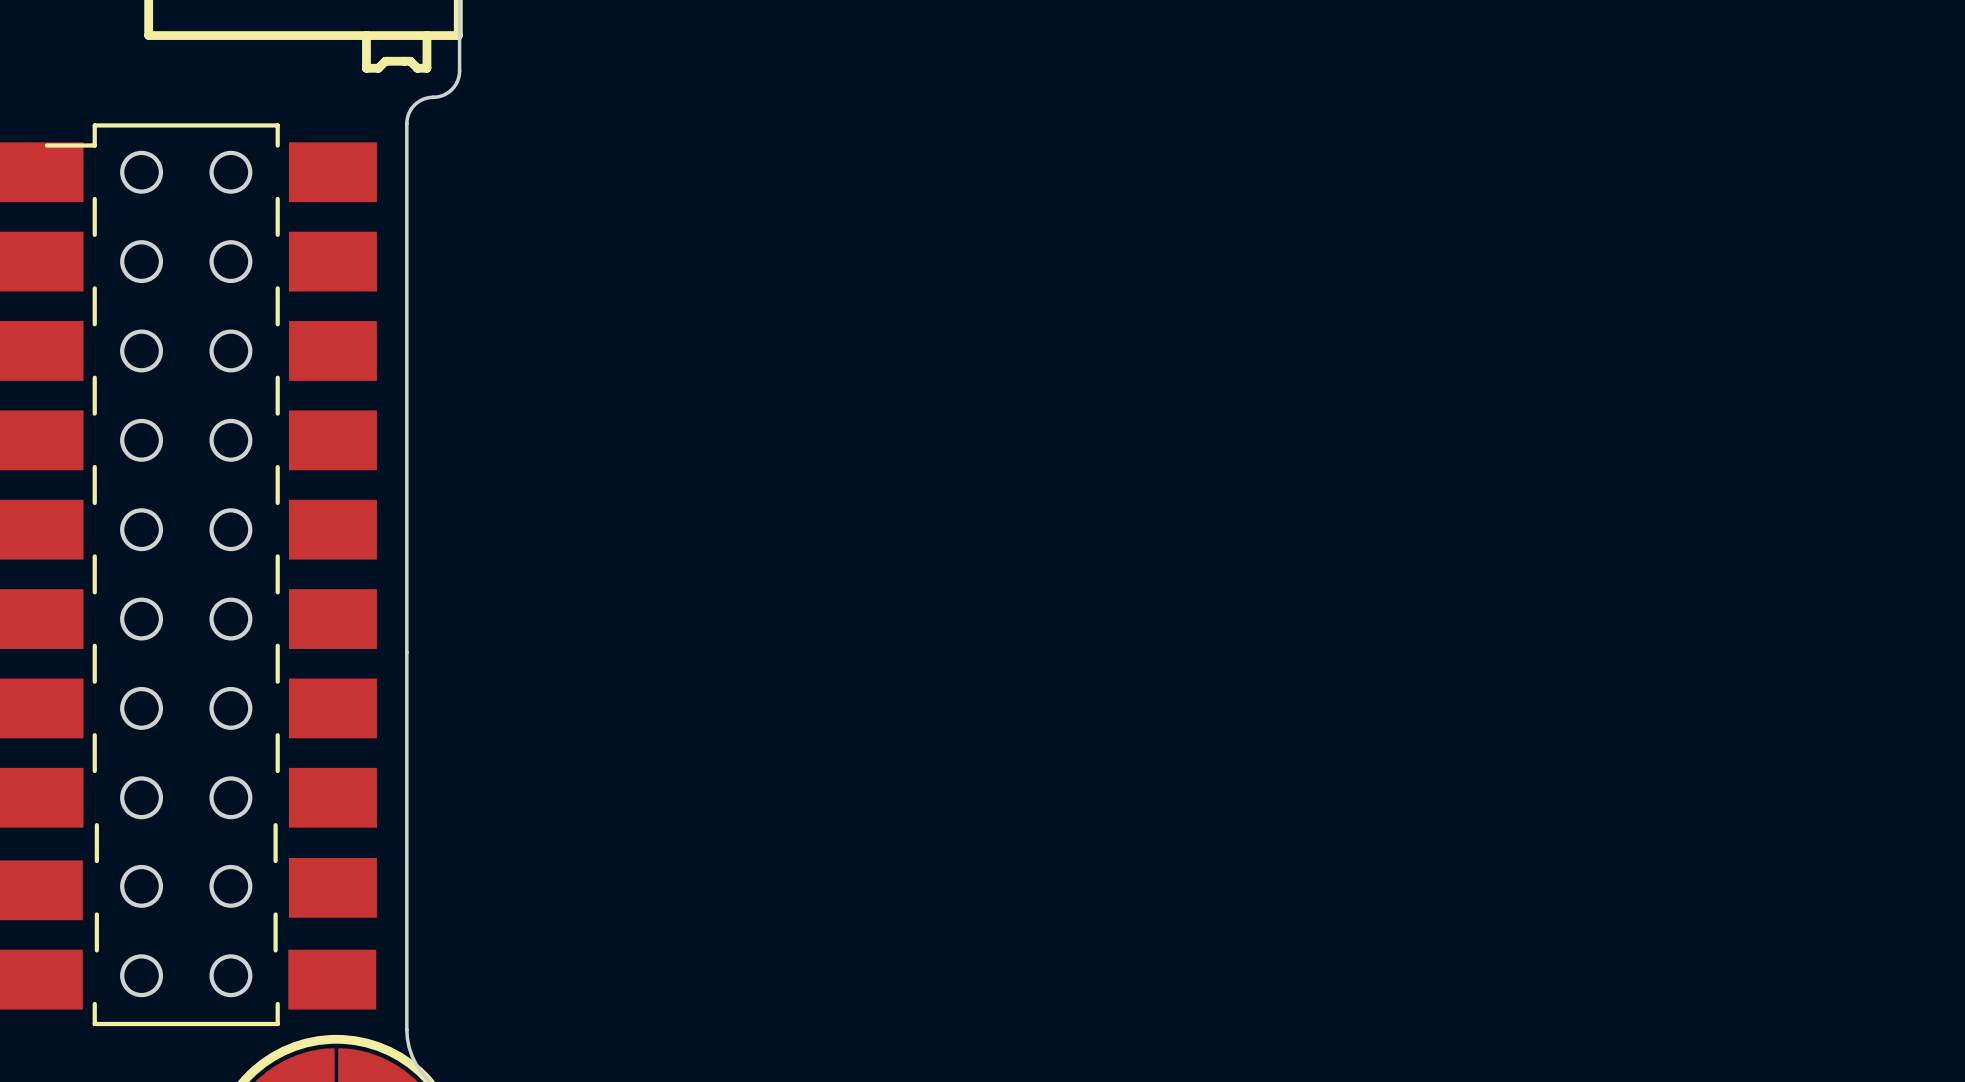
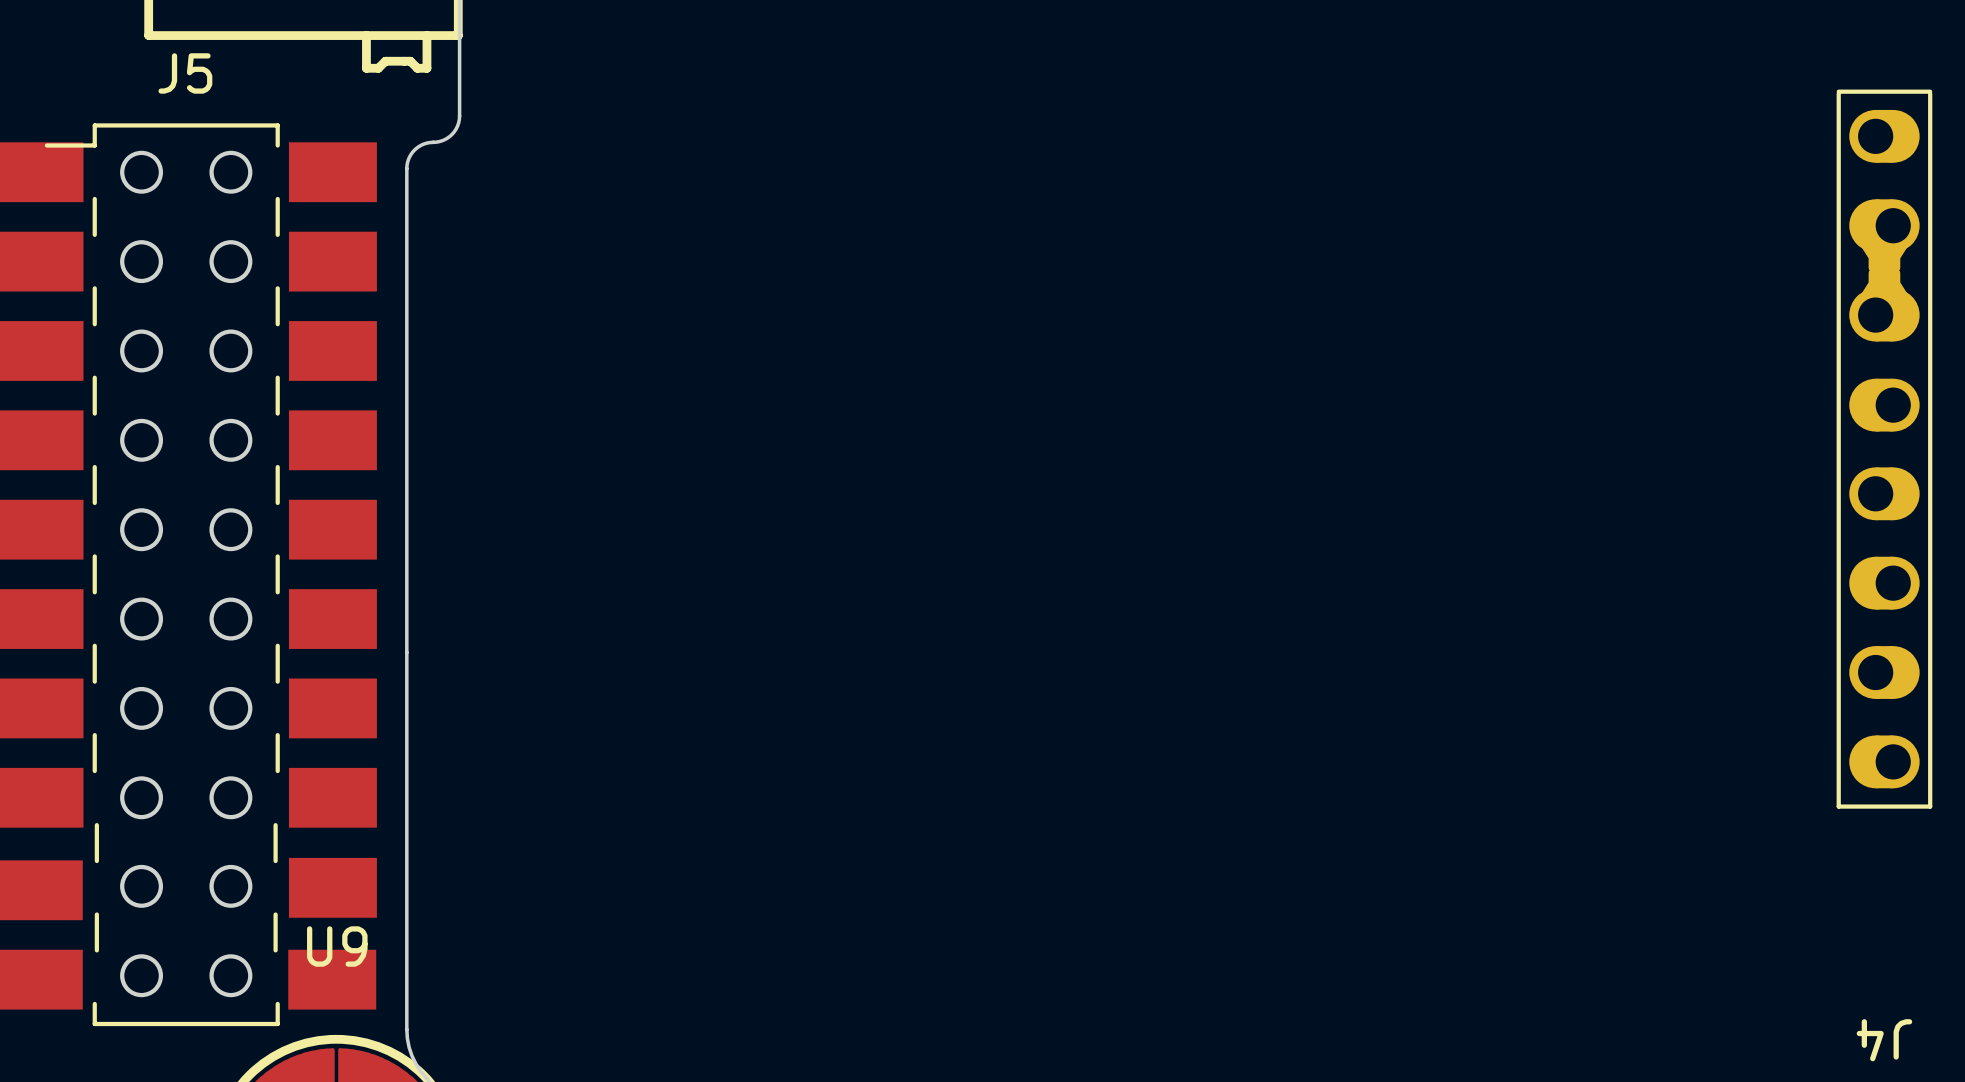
board edge: (459, 70) (456, 82) (449, 91) (441, 95) (423, 99) (410, 110) (406, 123) (406, 168) -> (459, 70) (459, 115) (456, 129) (443, 140) (424, 143) (416, 148) (409, 157) (406, 168)
J5 name: none -> J5 (185, 73)
J4: none -> (1884, 449)
U9 name: none -> U9 (337, 946)

